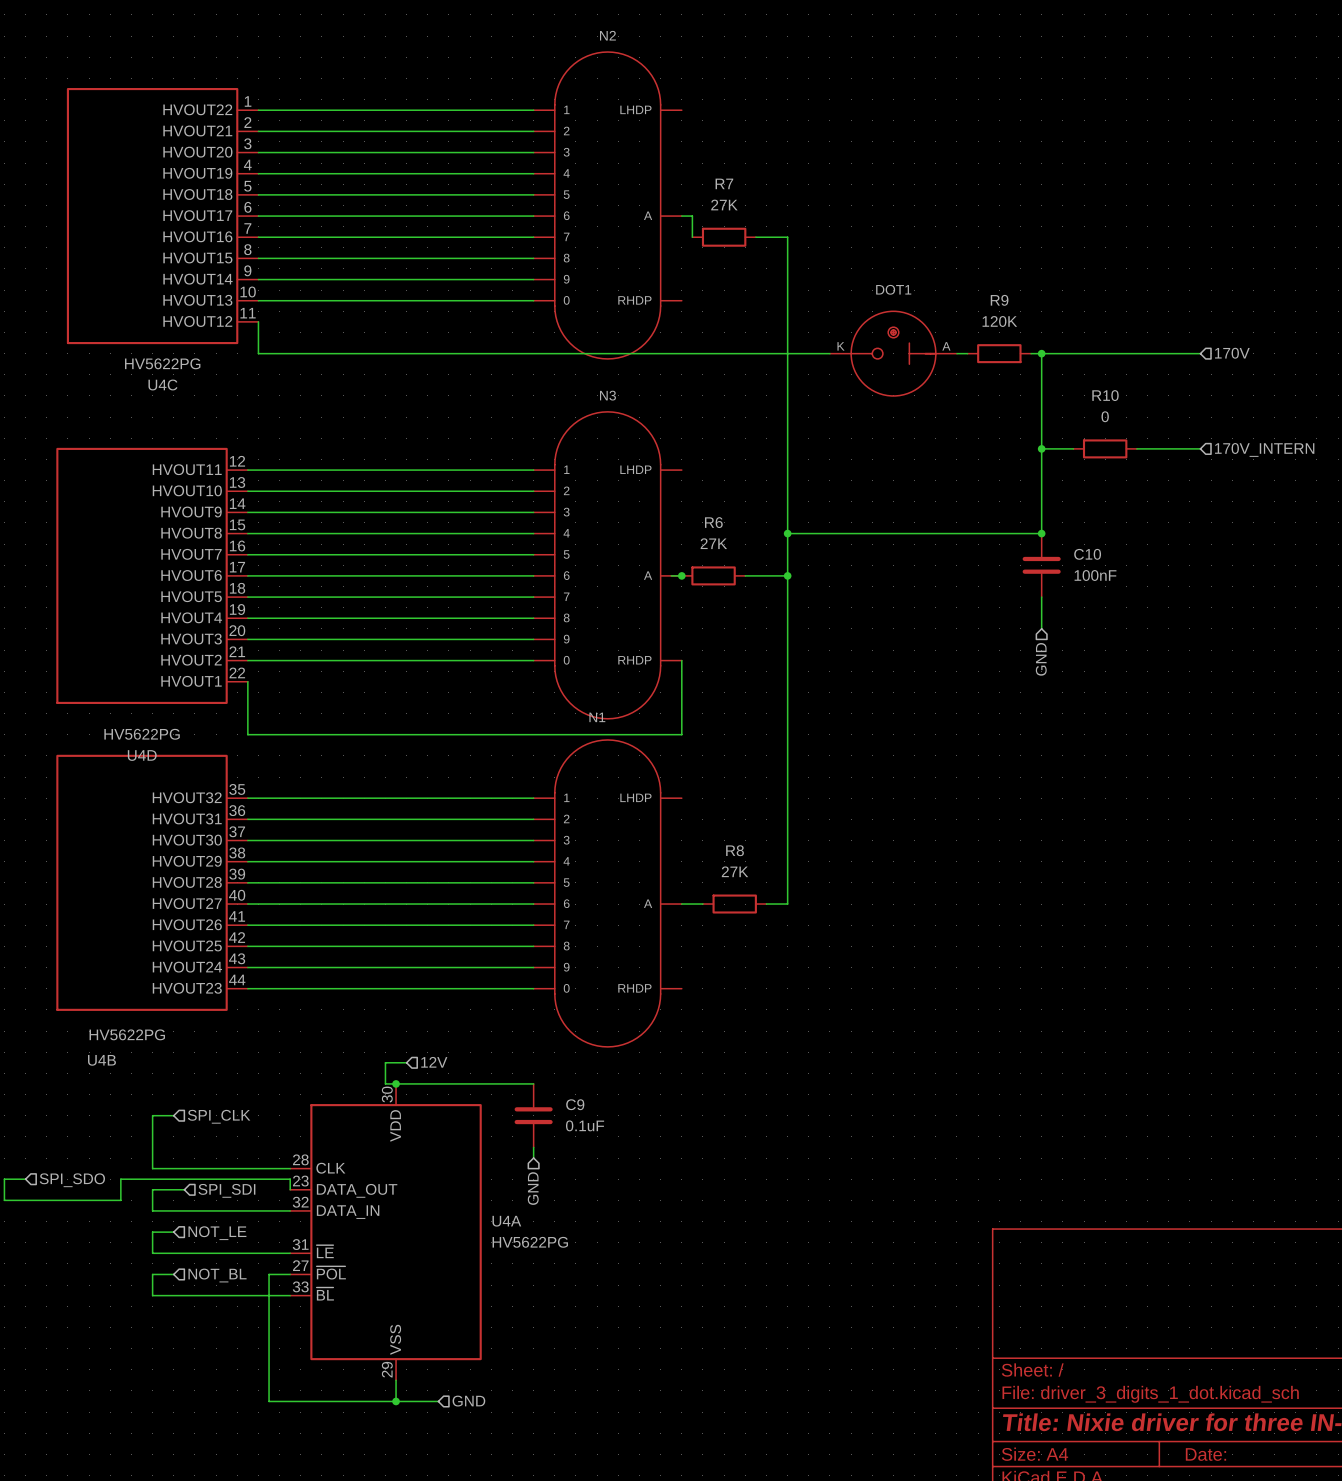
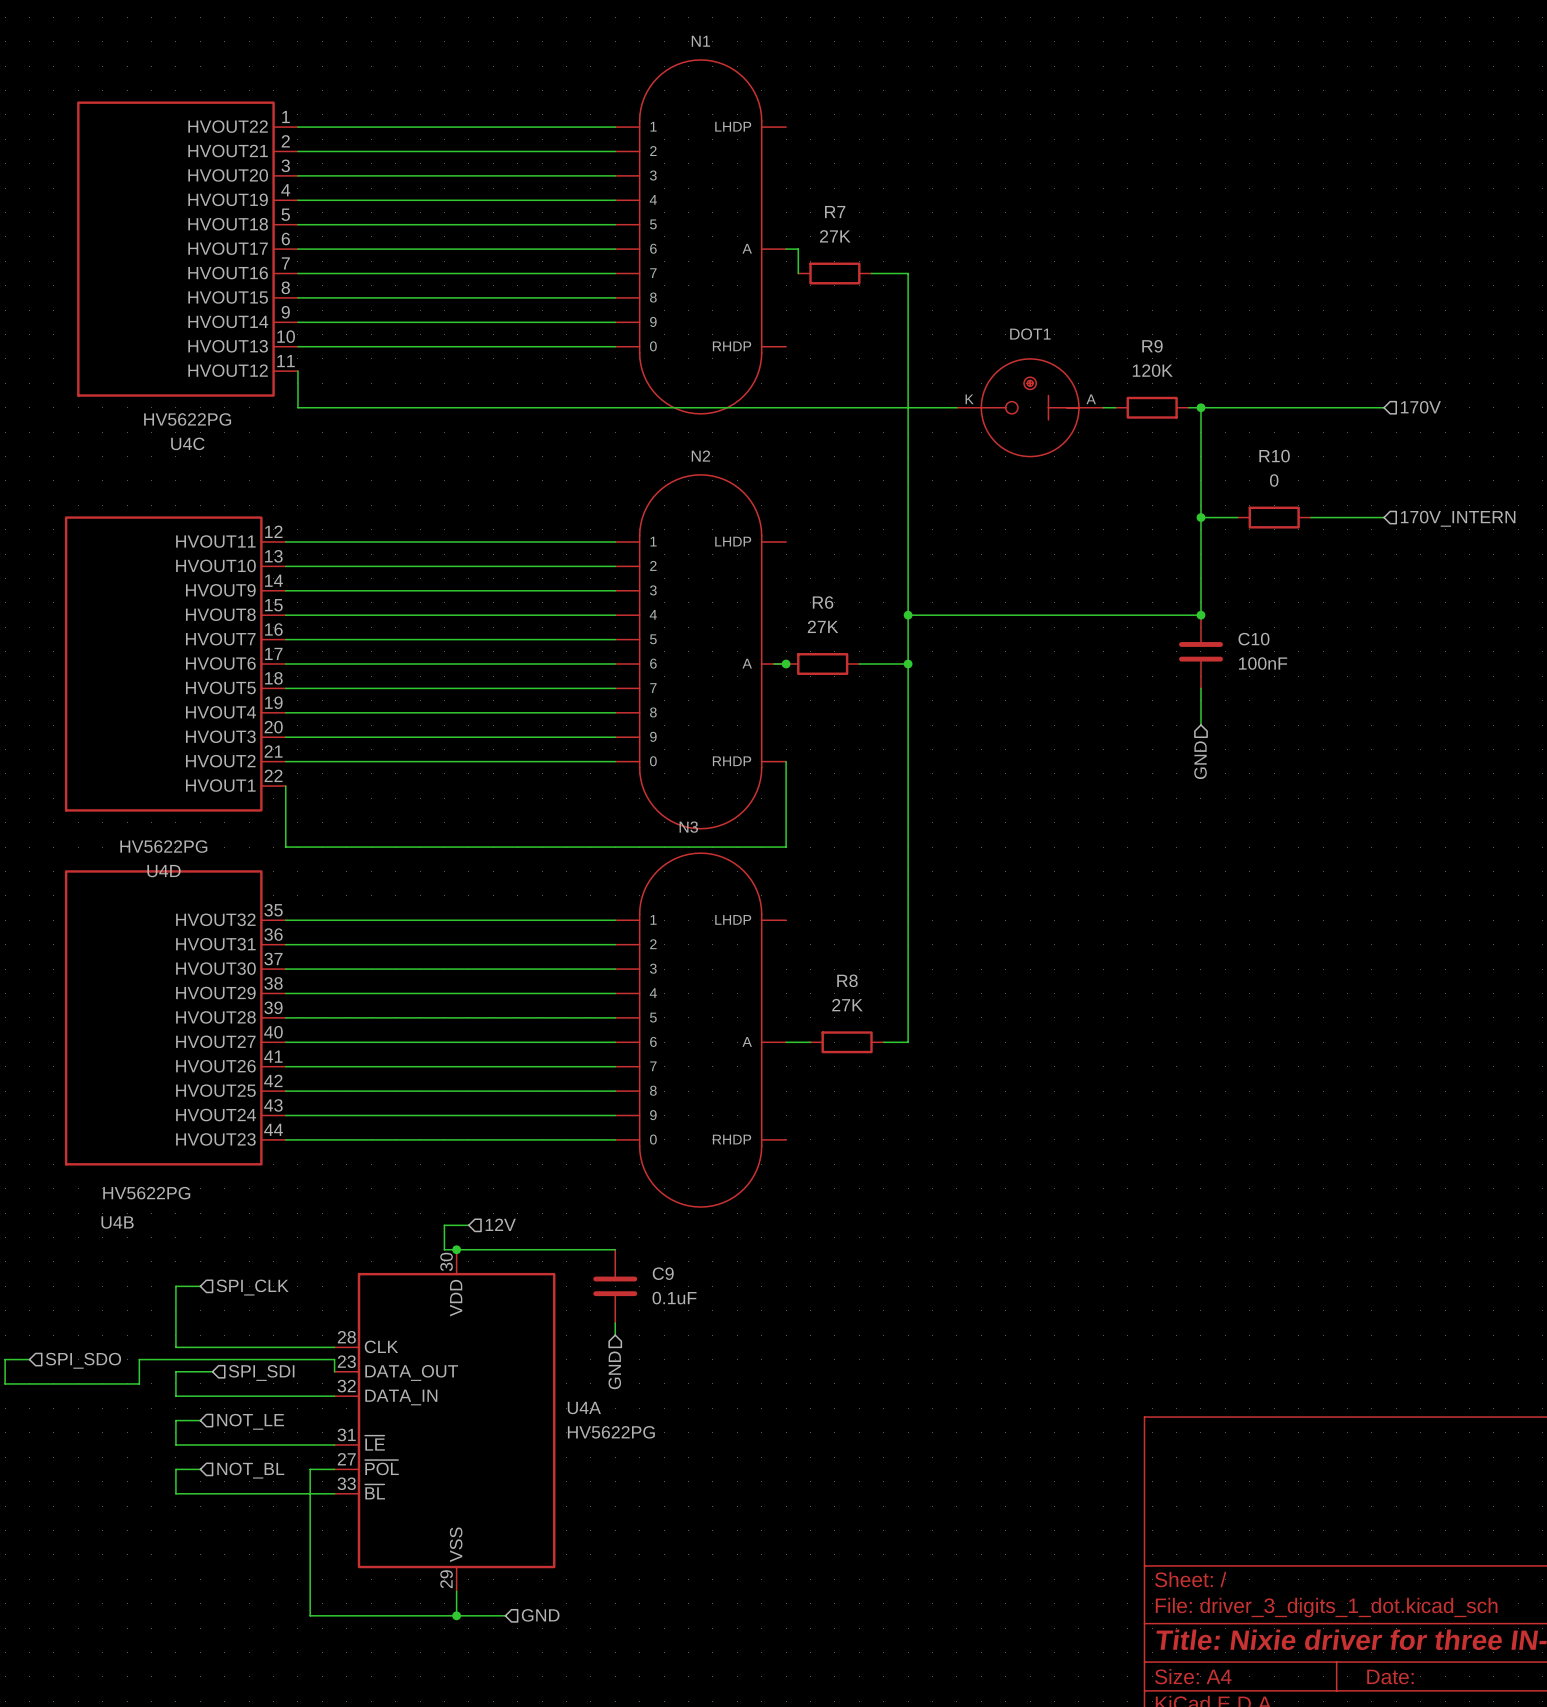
N2 name: N2 (607, 35) -> N1 (700, 41)
N3 name: N3 (607, 395) -> N2 (700, 456)
N1 name: N1 (597, 717) -> N3 (688, 827)

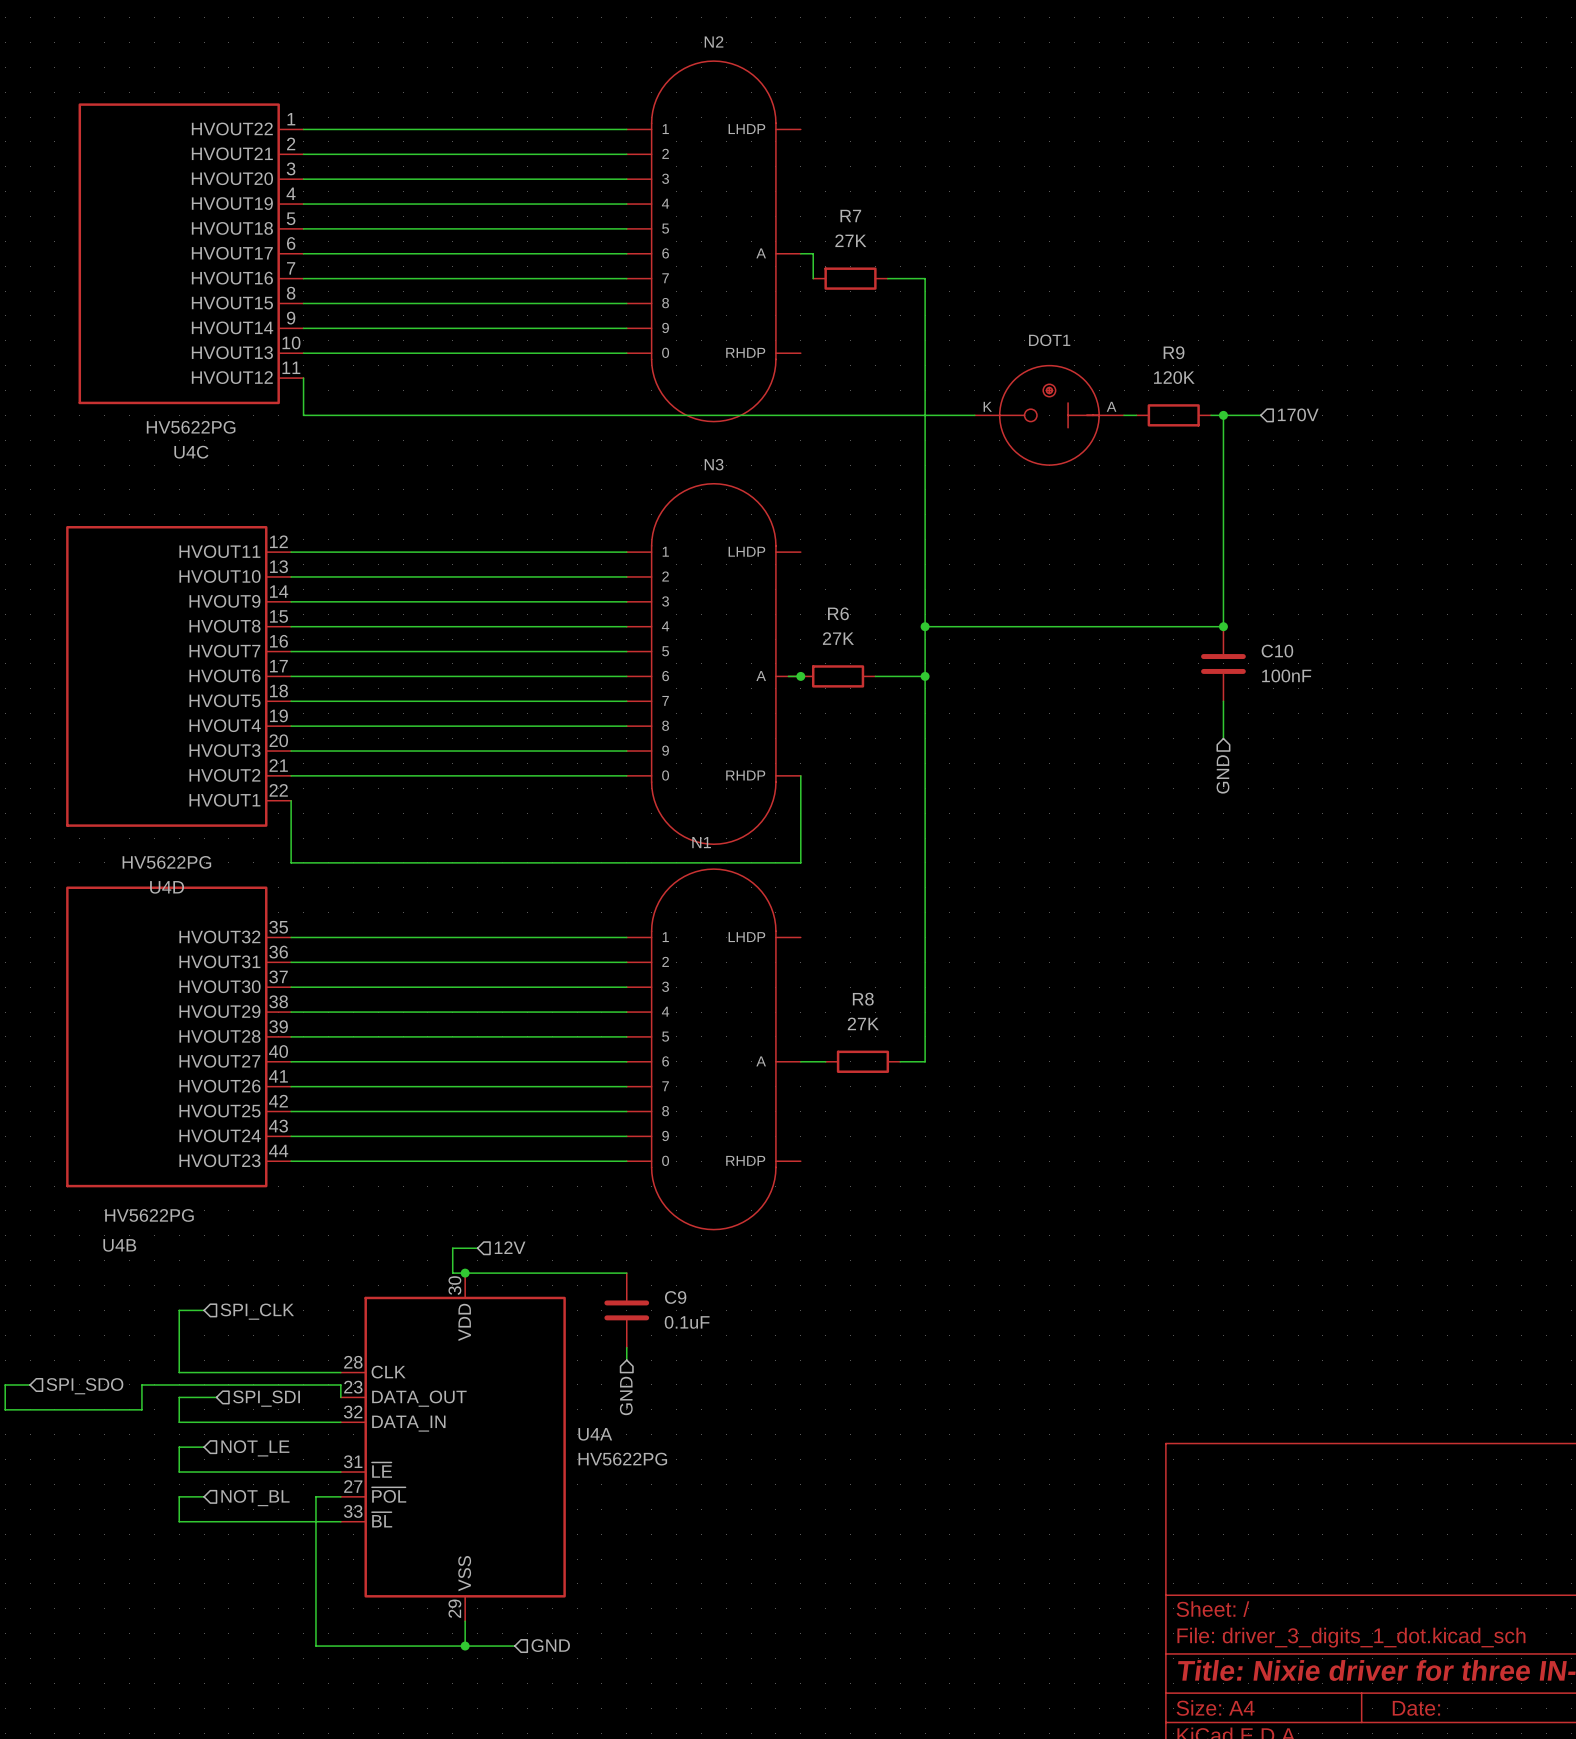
N1 name: N1 (700, 41) -> N2 (714, 41)
wire: (1237, 407) (1384, 407) -> none
hierarchical label position: 170V (1420, 407) -> 170V (1298, 414)
N2 name: N2 (700, 456) -> N3 (714, 464)
wire: (1200, 517) (1237, 517) -> none
junction: (1200, 517) -> none
R10: 0 (1274, 517) -> none
wire: (1310, 517) (1384, 517) -> none
hierarchical label: 170V_INTERN (1458, 518) -> none
N3 name: N3 (688, 827) -> N1 (701, 842)

